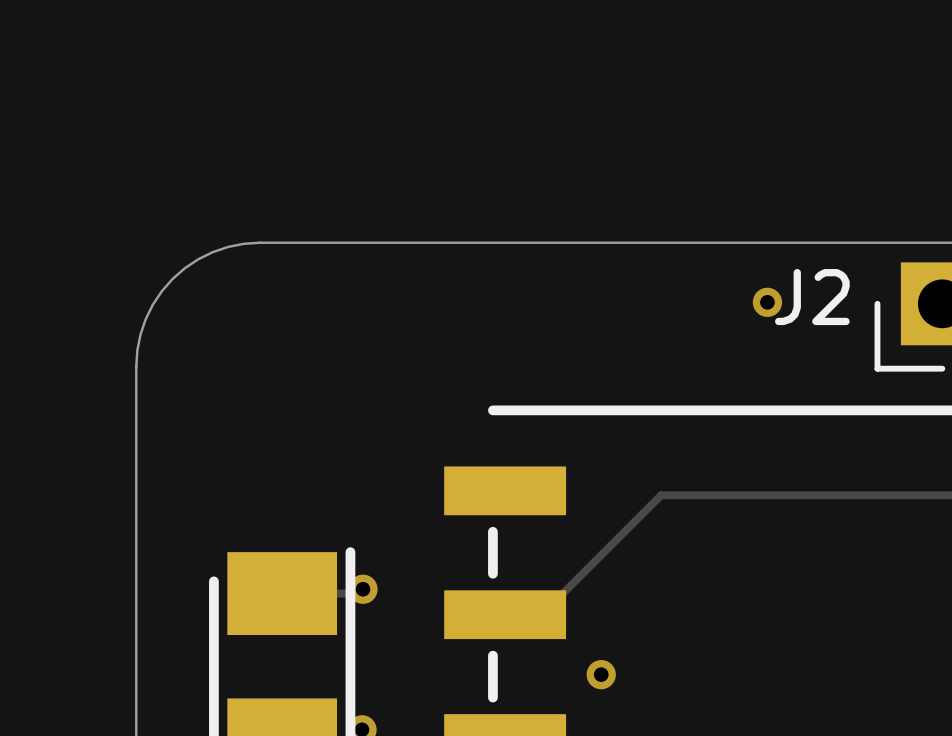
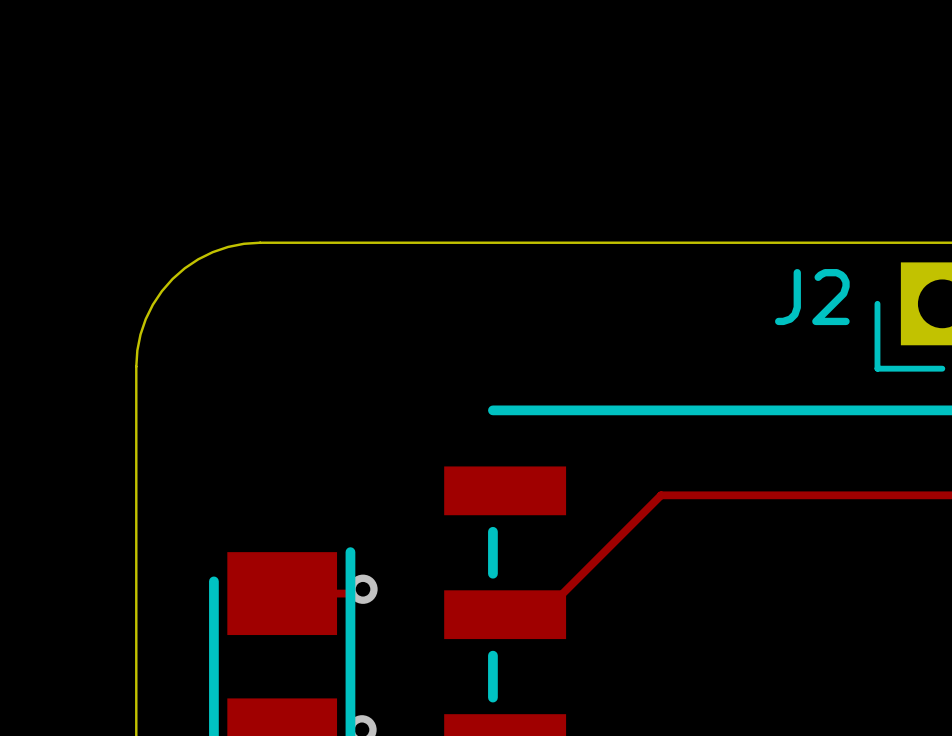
via: (767, 302) -> none
via: (601, 674) -> none

